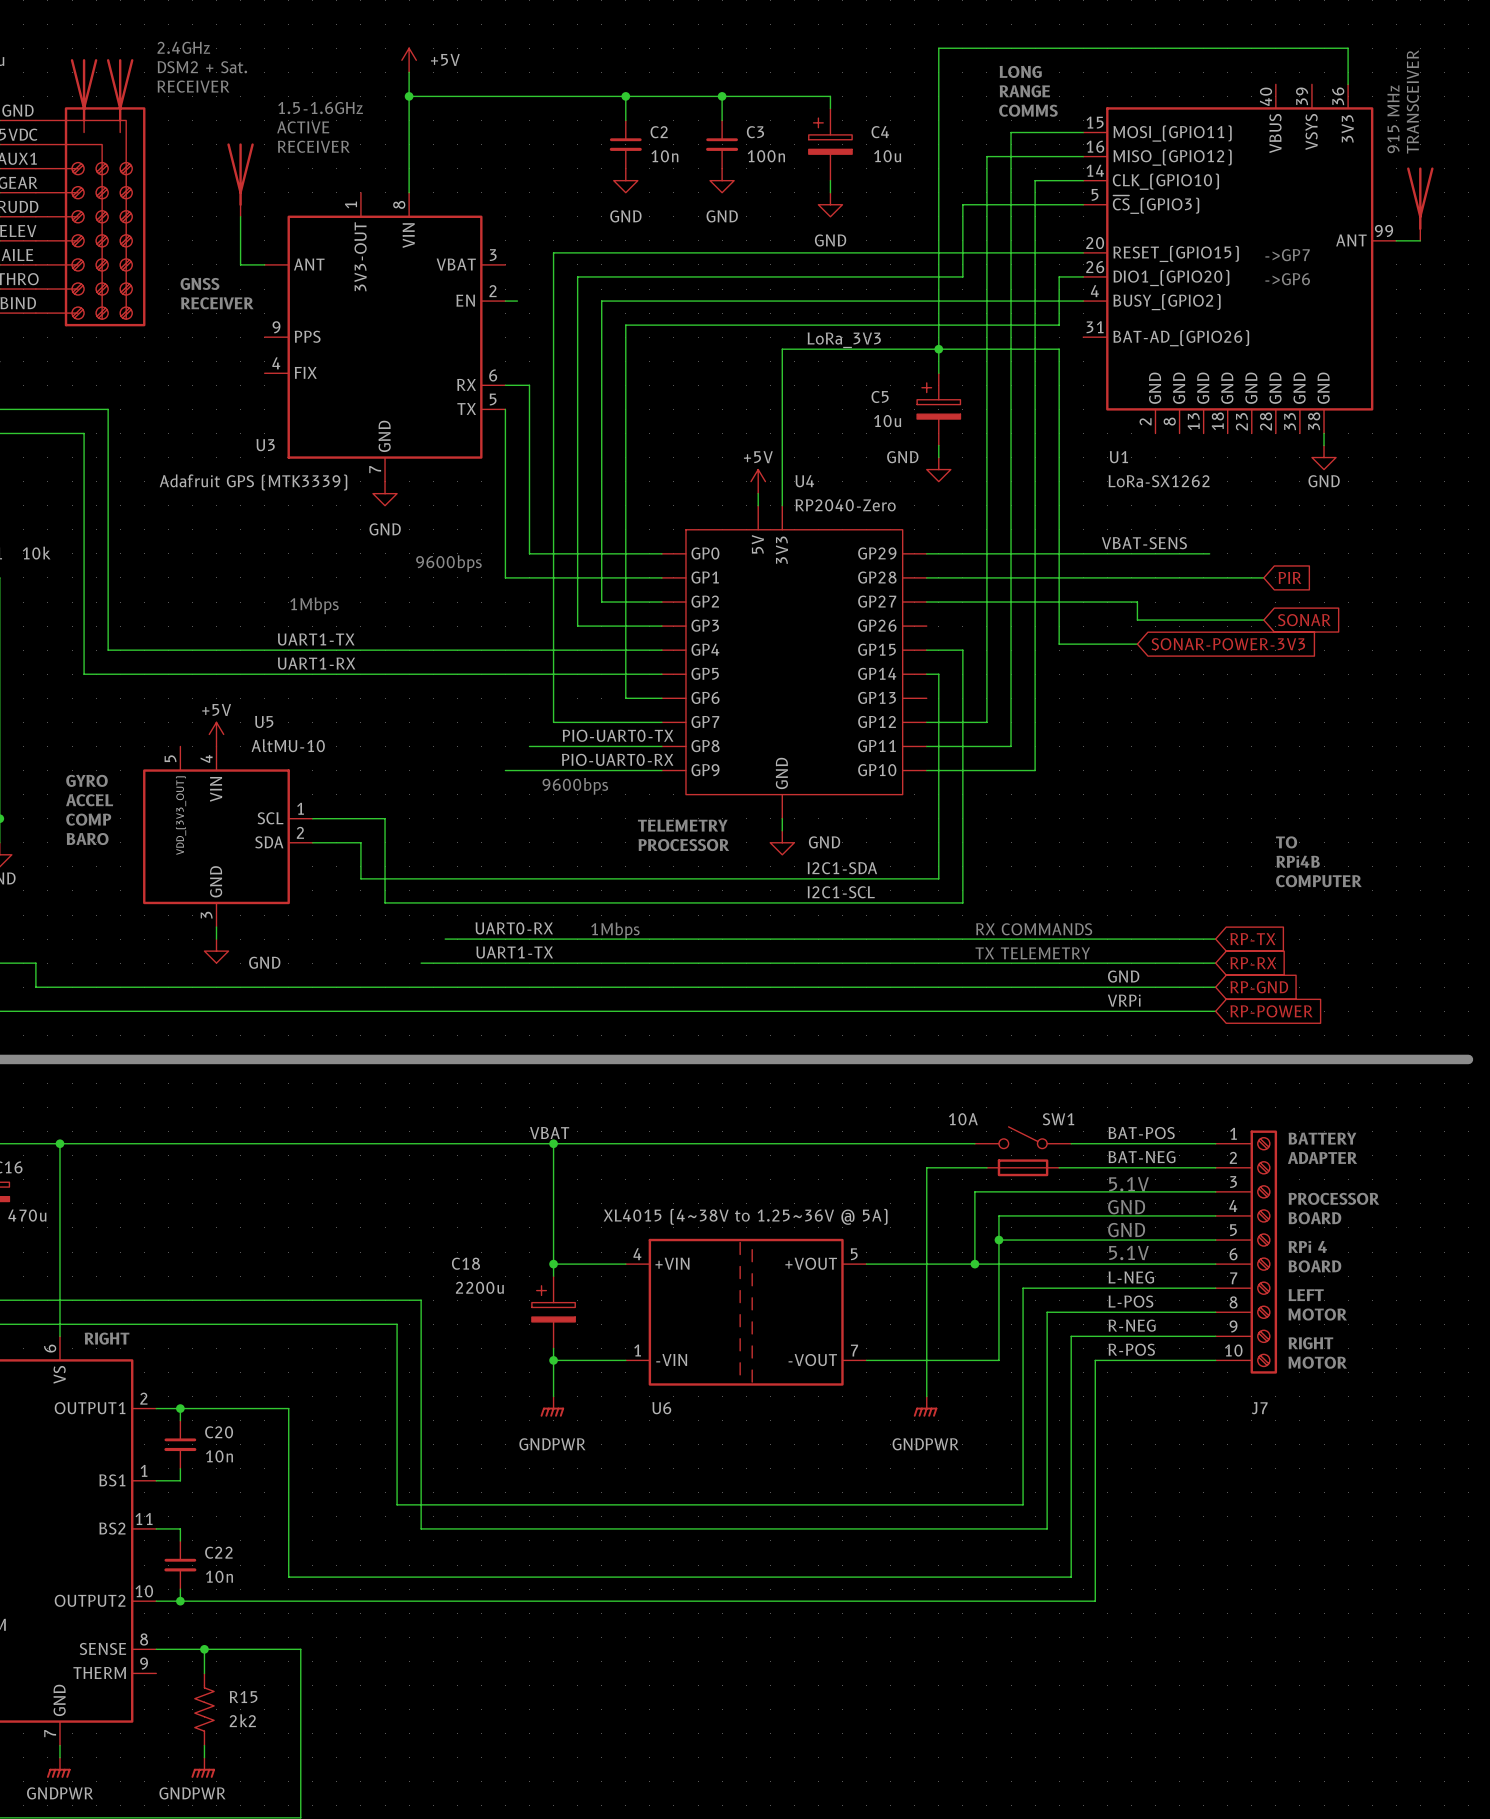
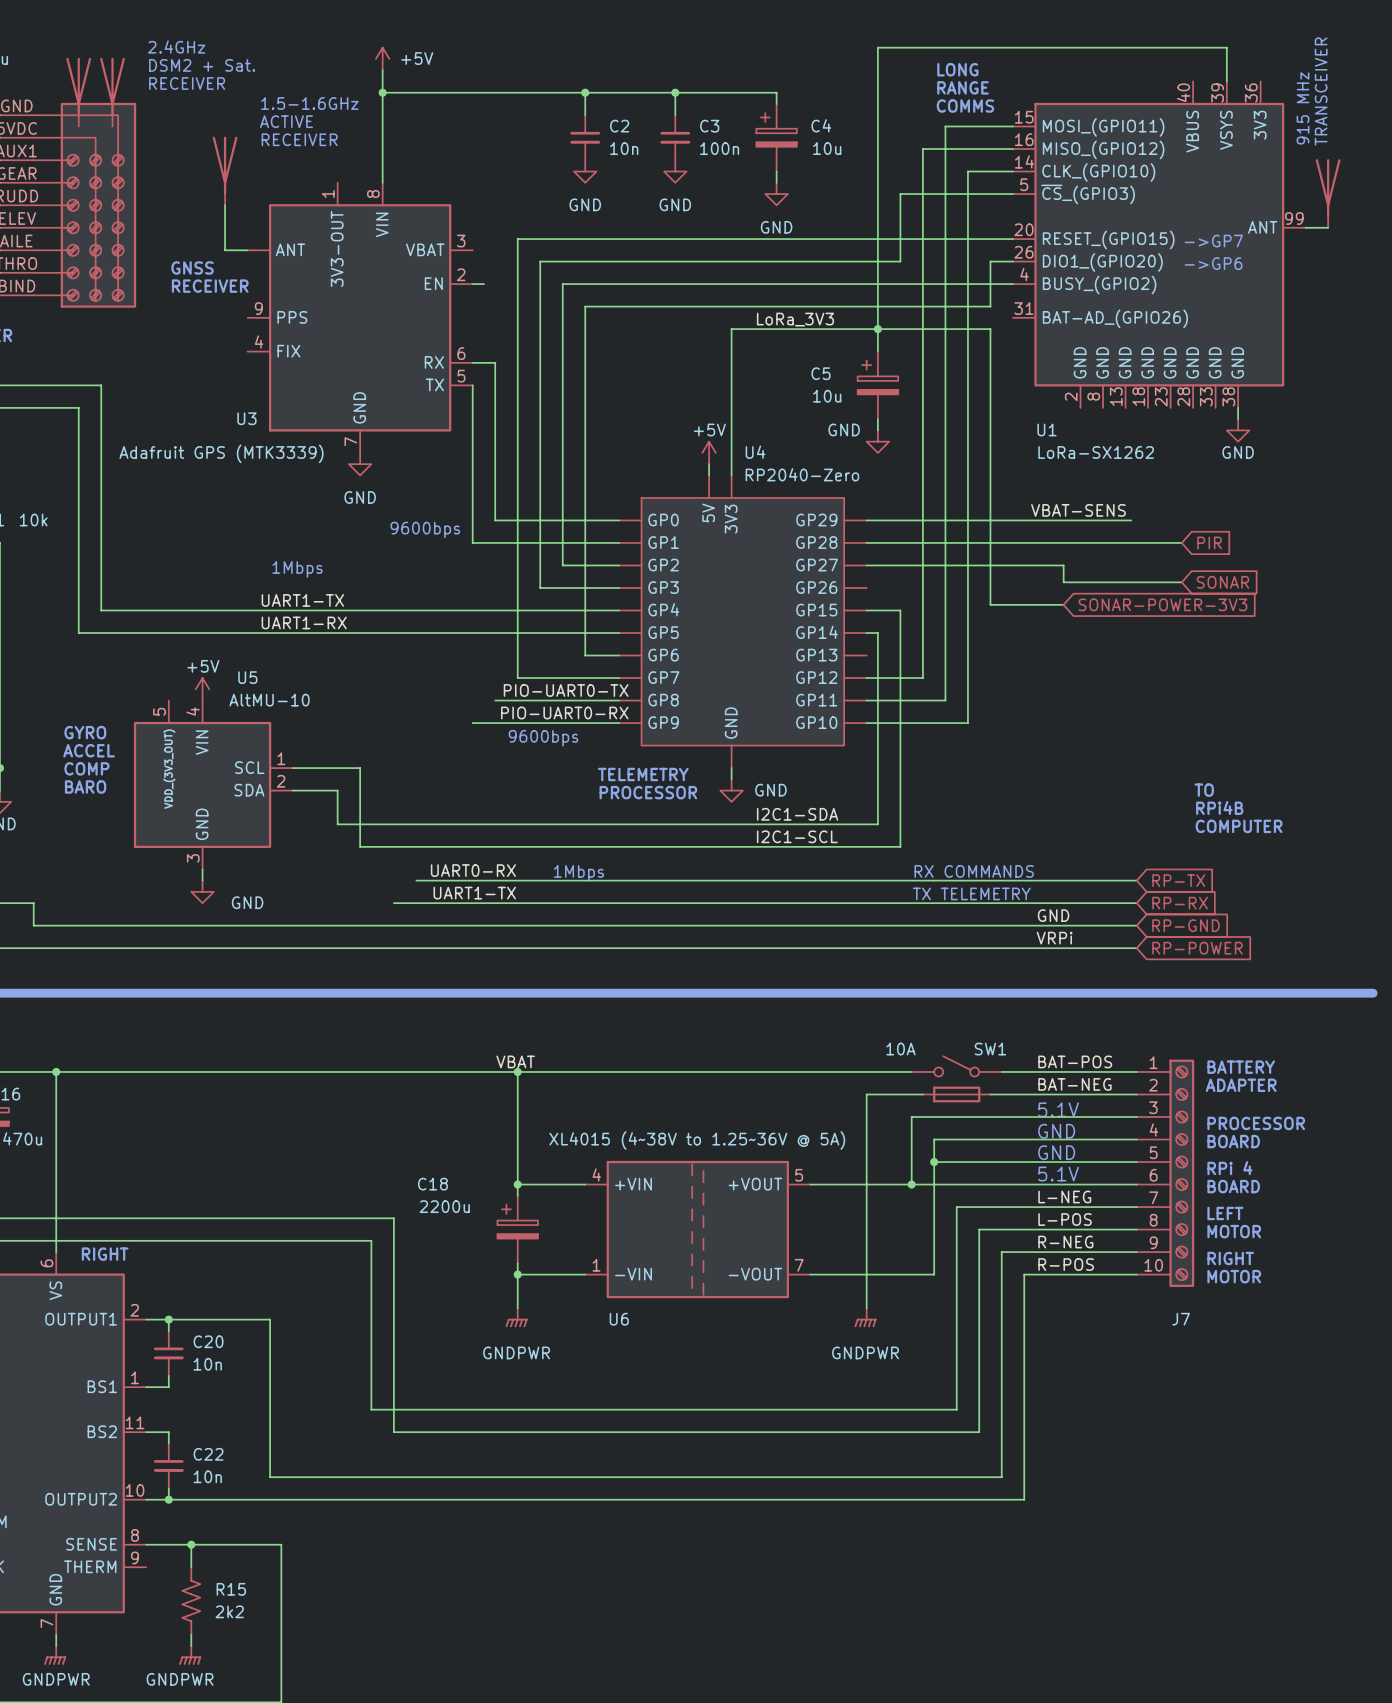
wire: (1311, 48) (1348, 48) (1348, 84) -> (1226, 47) (1226, 81)

